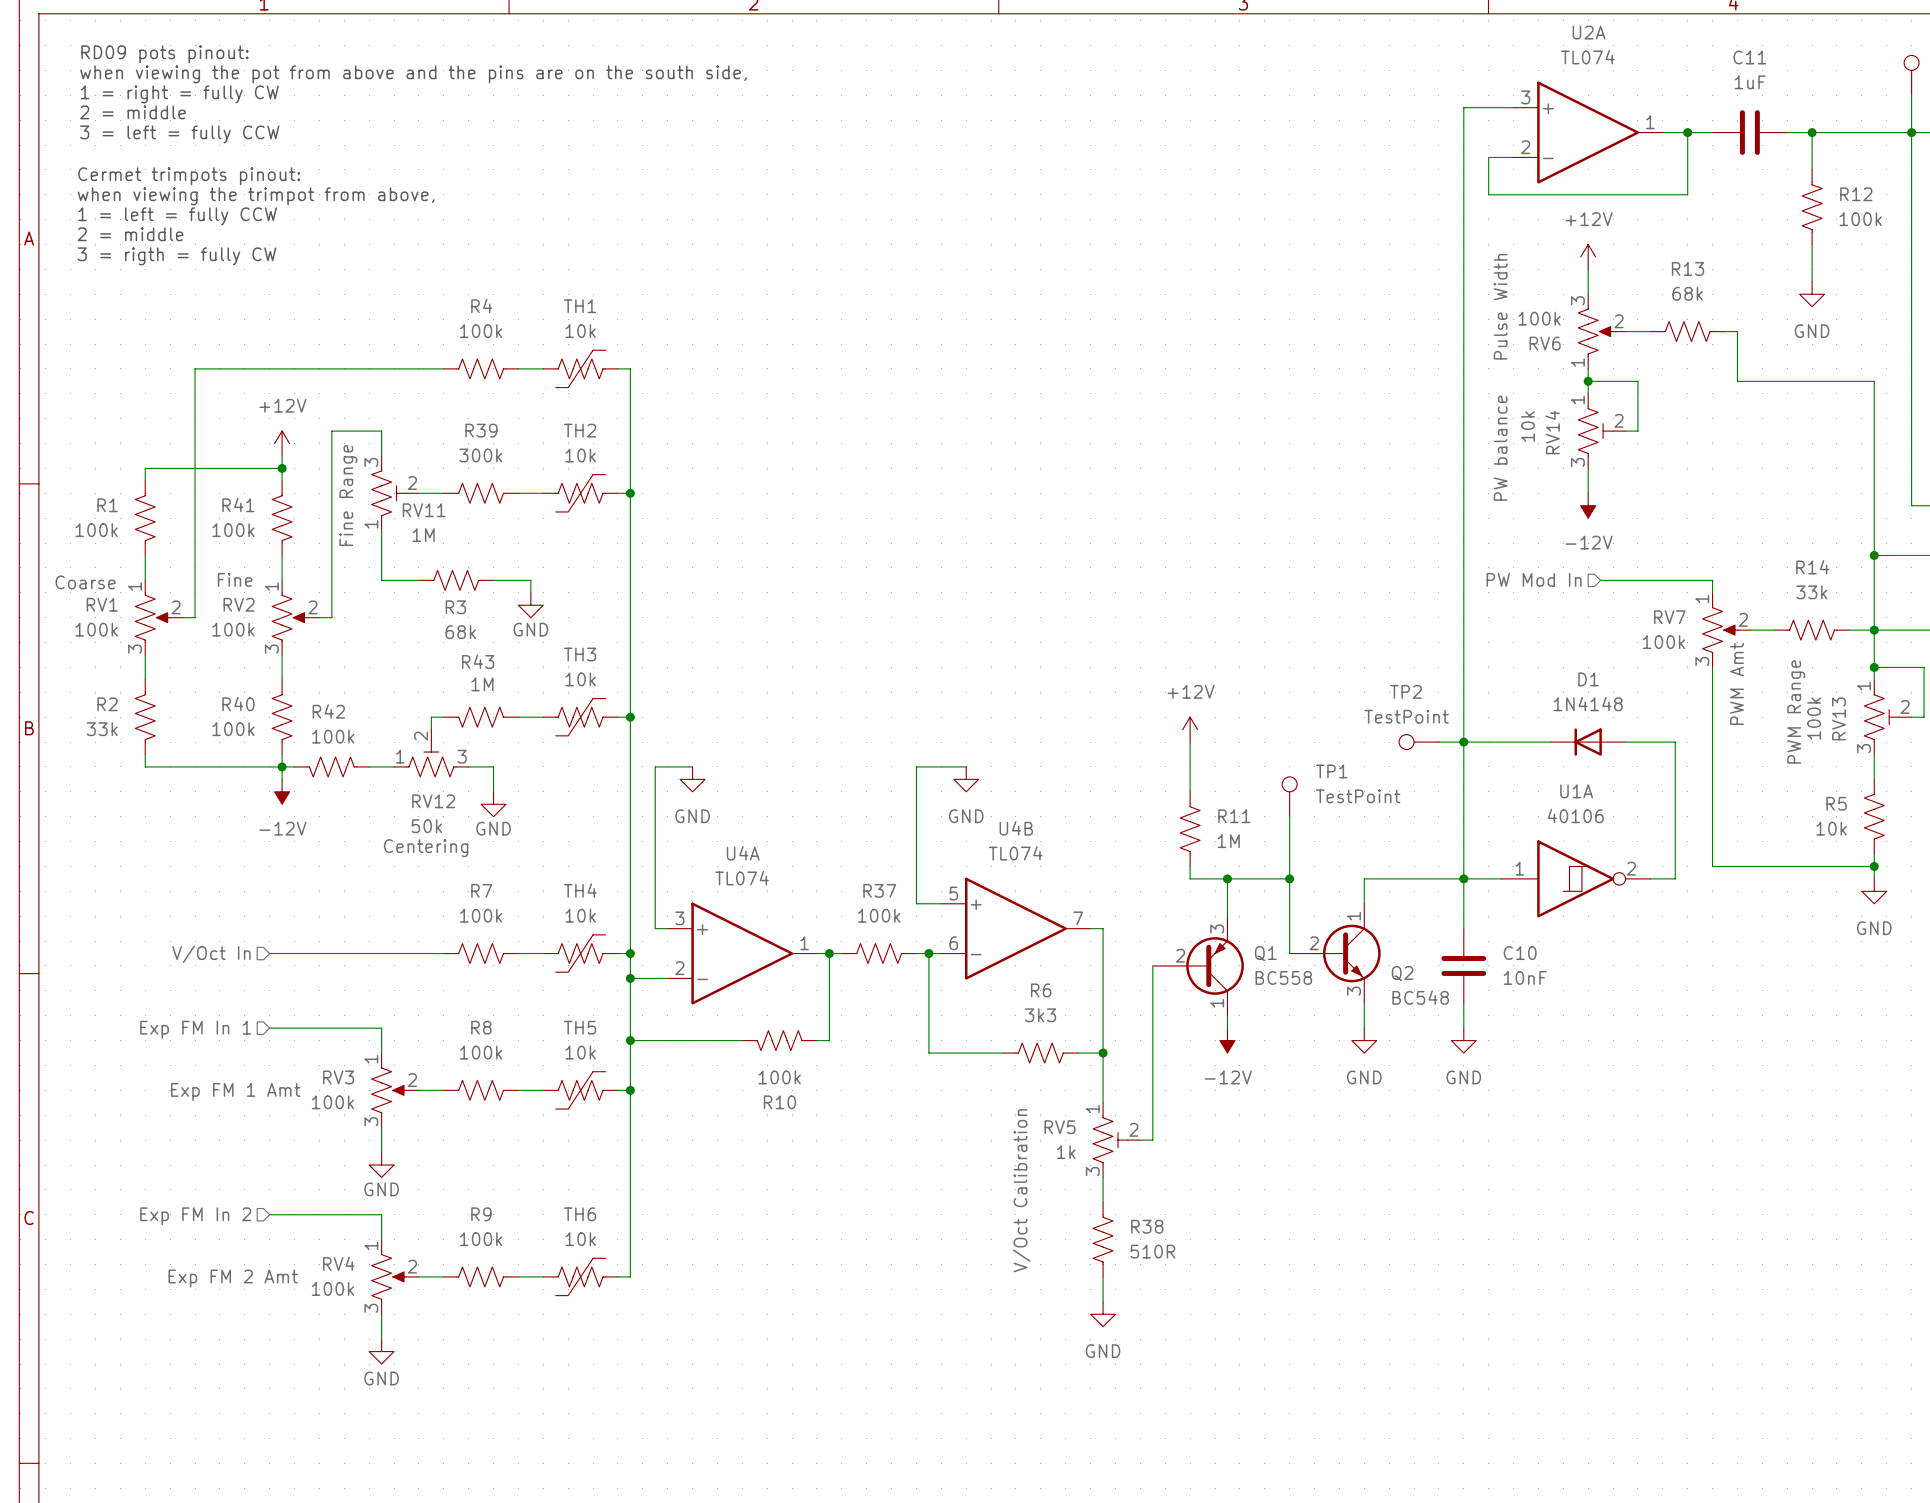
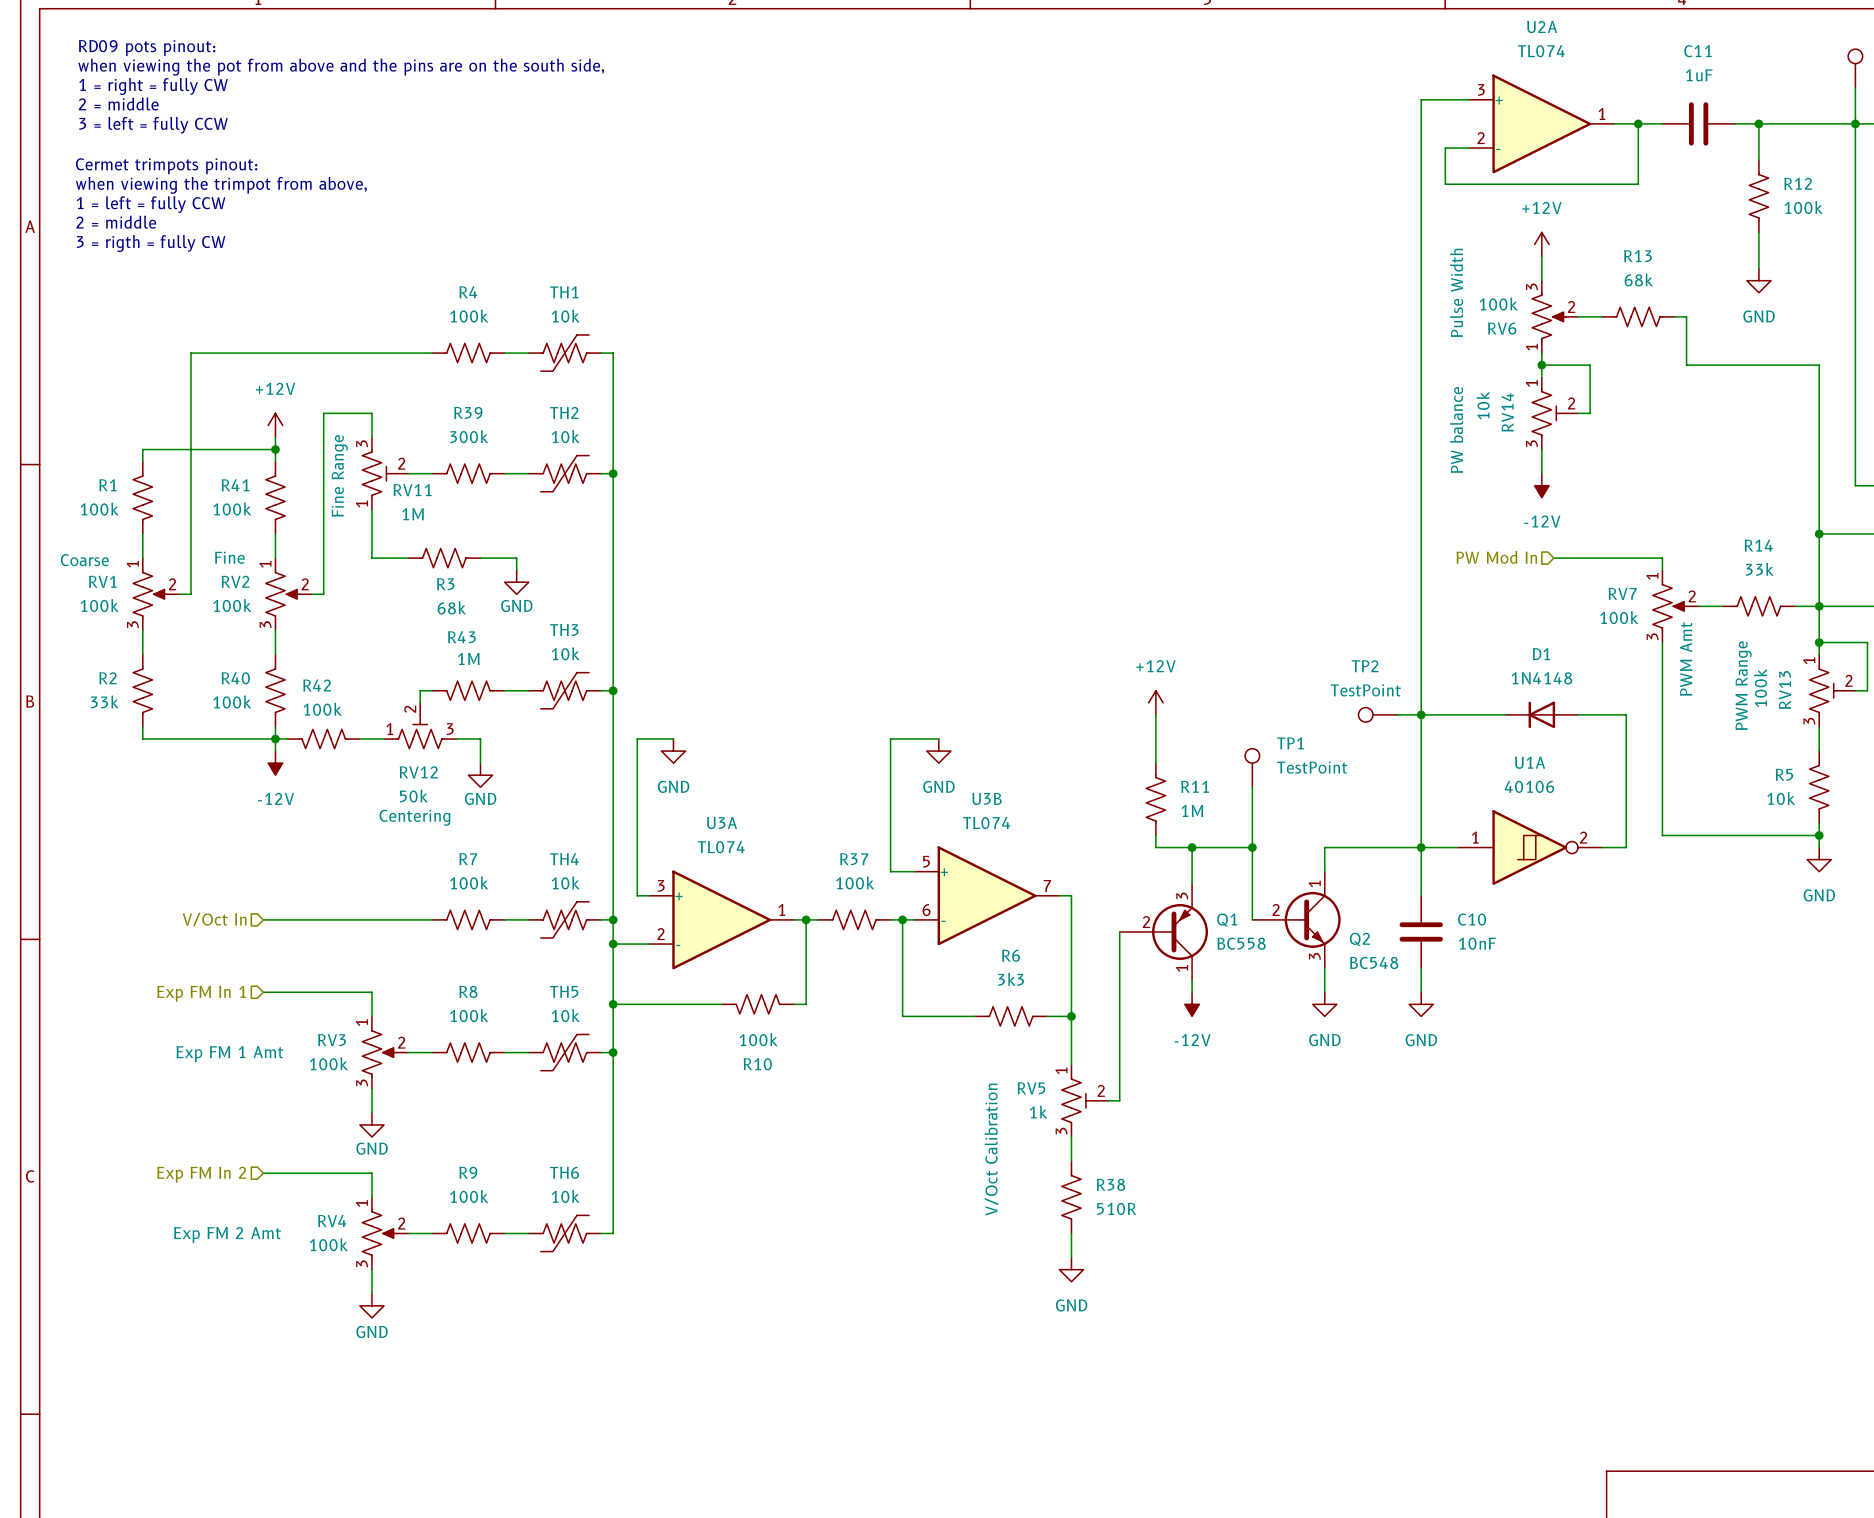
U4B name: U4B (1016, 828) -> U3B (987, 798)
U4A name: U4A (743, 853) -> U3A (722, 823)

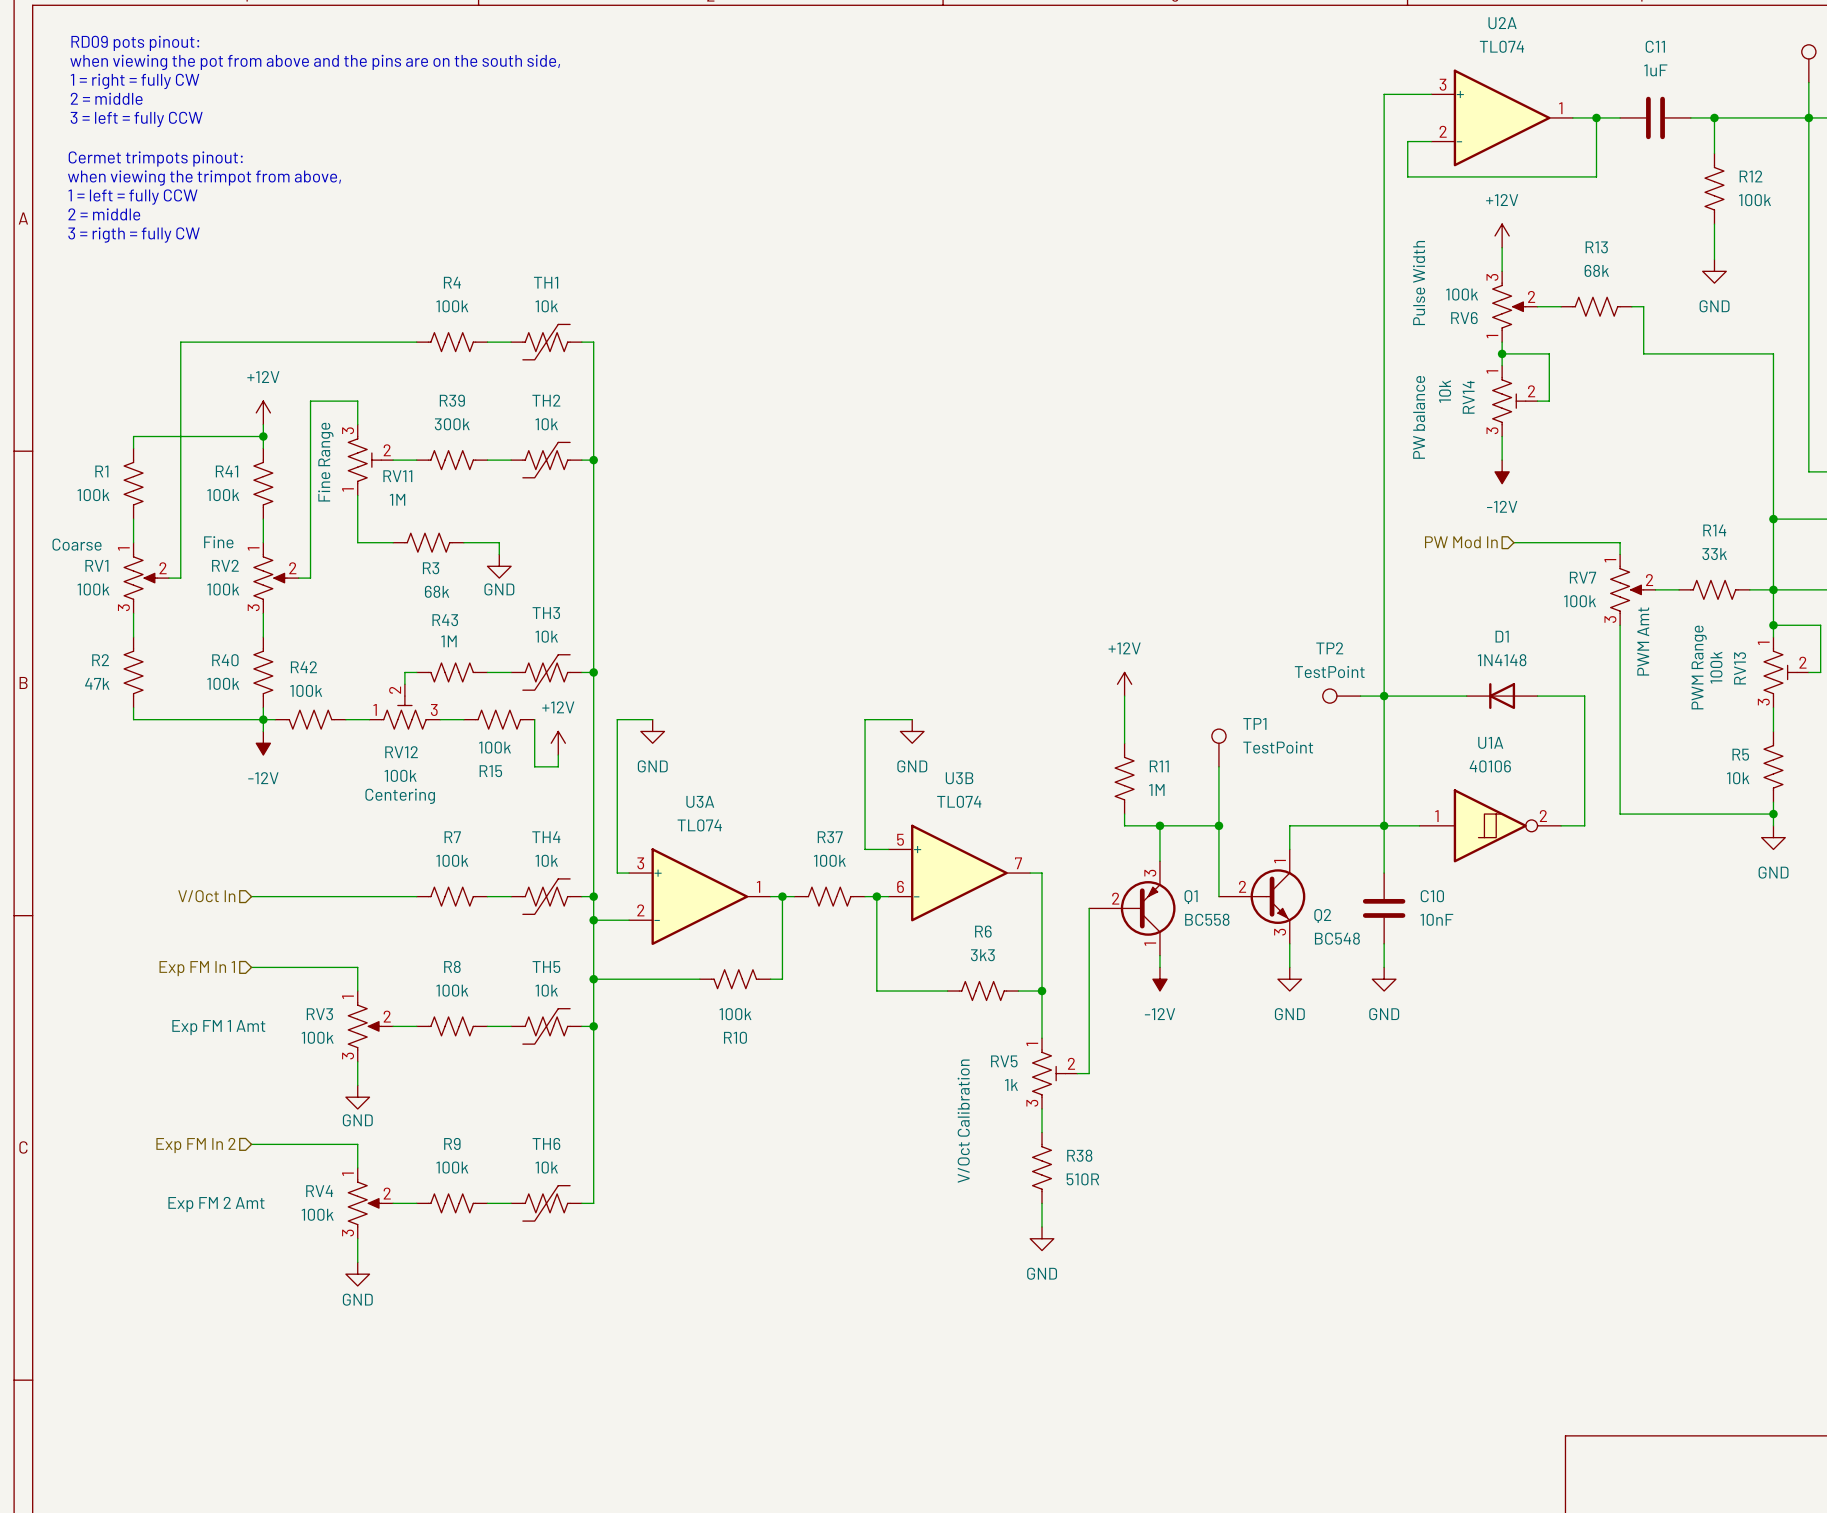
R2 value: 33k (104, 701) -> 47k (97, 683)
wire: (480, 739) (480, 763) -> none
R15: none -> 100k (499, 719)
wire: none -> (534, 719) (534, 766) (558, 766) (558, 755)
power symbol: none -> +12V (558, 743)
power symbol: GND (480, 775) -> none
RV12 value: 50k (413, 796) -> 100k (400, 775)

